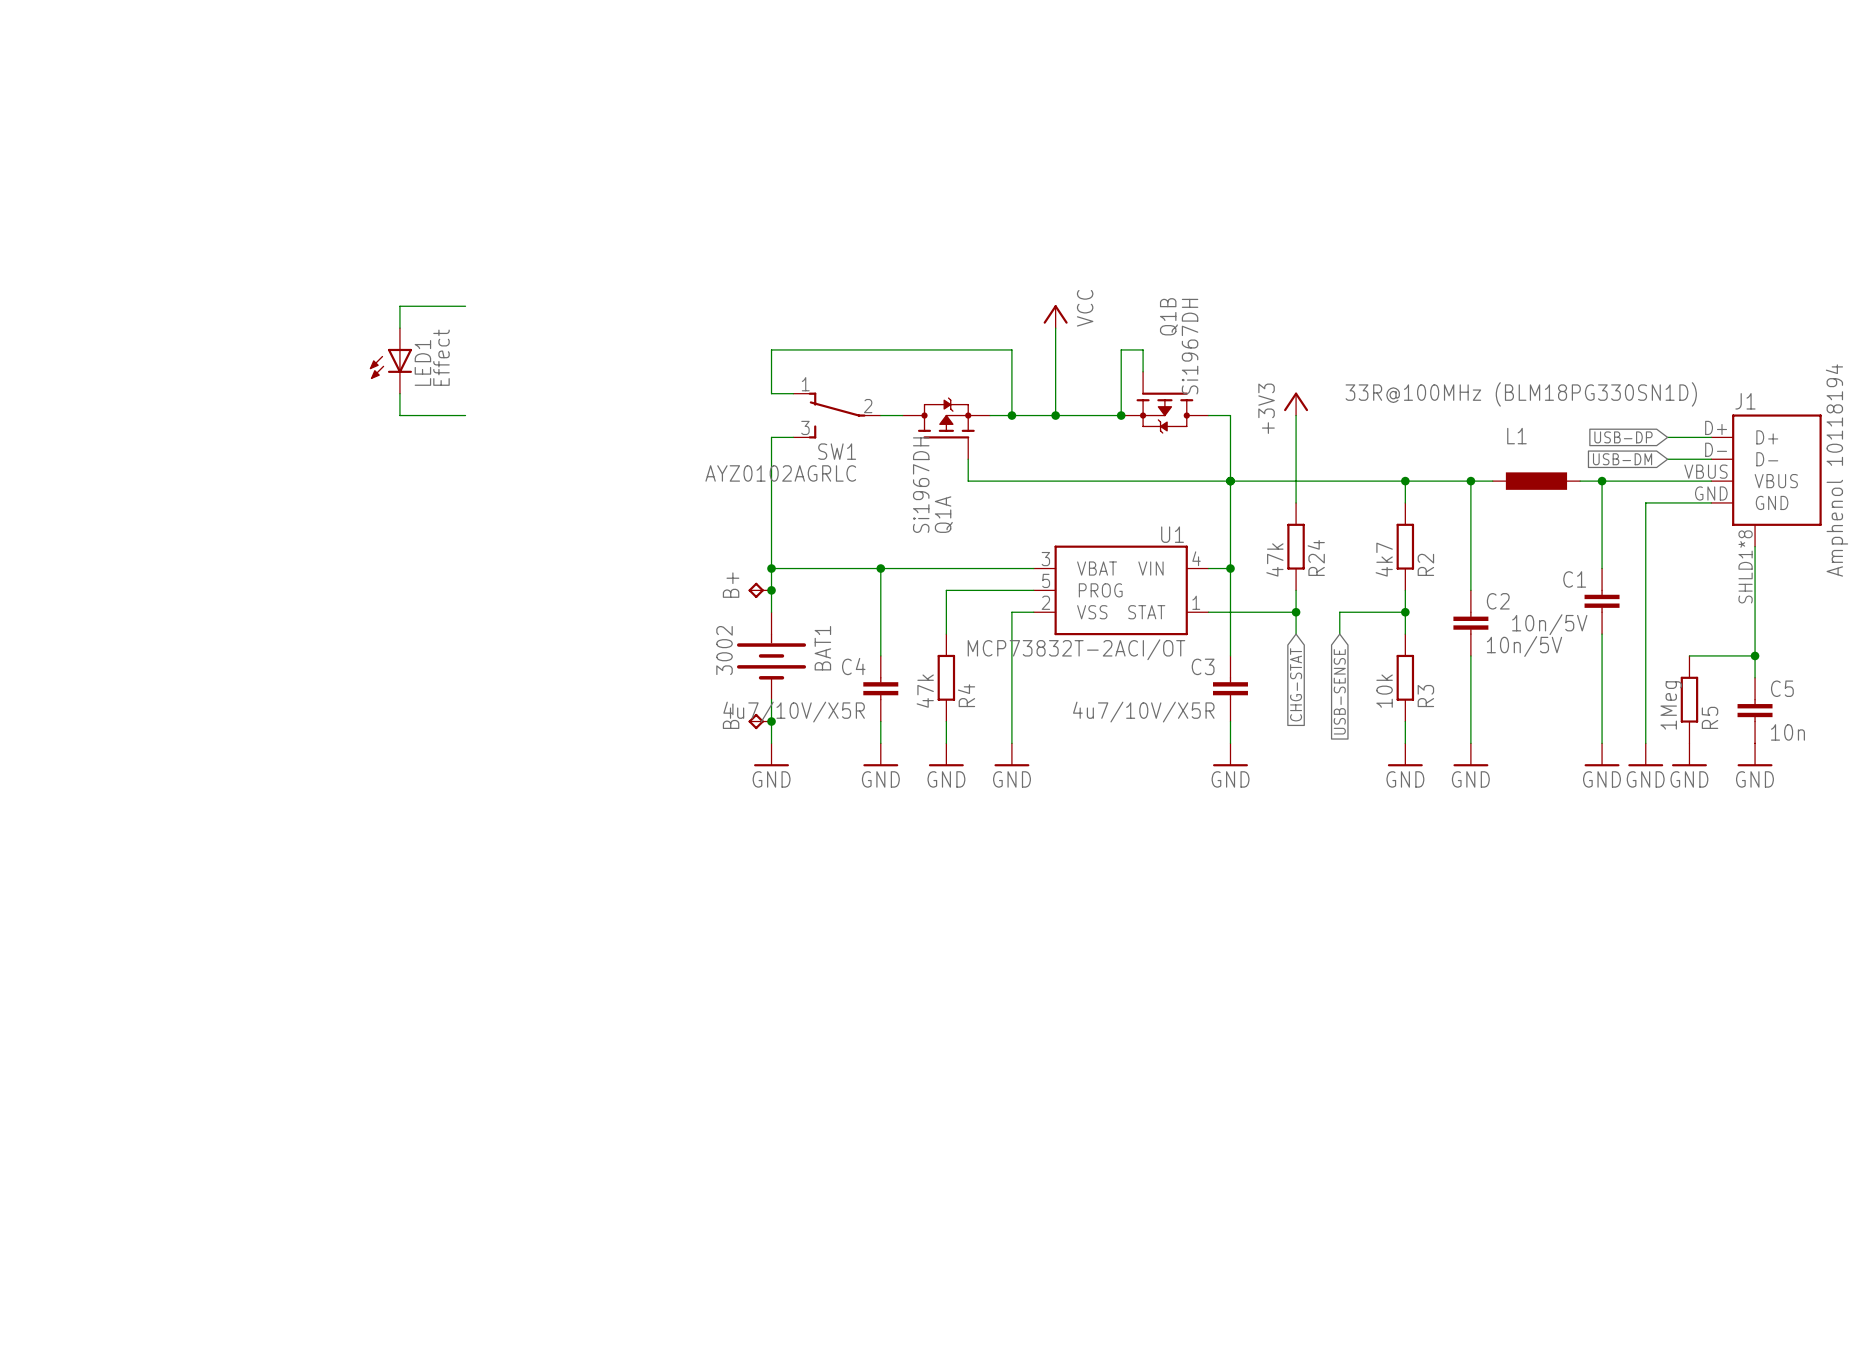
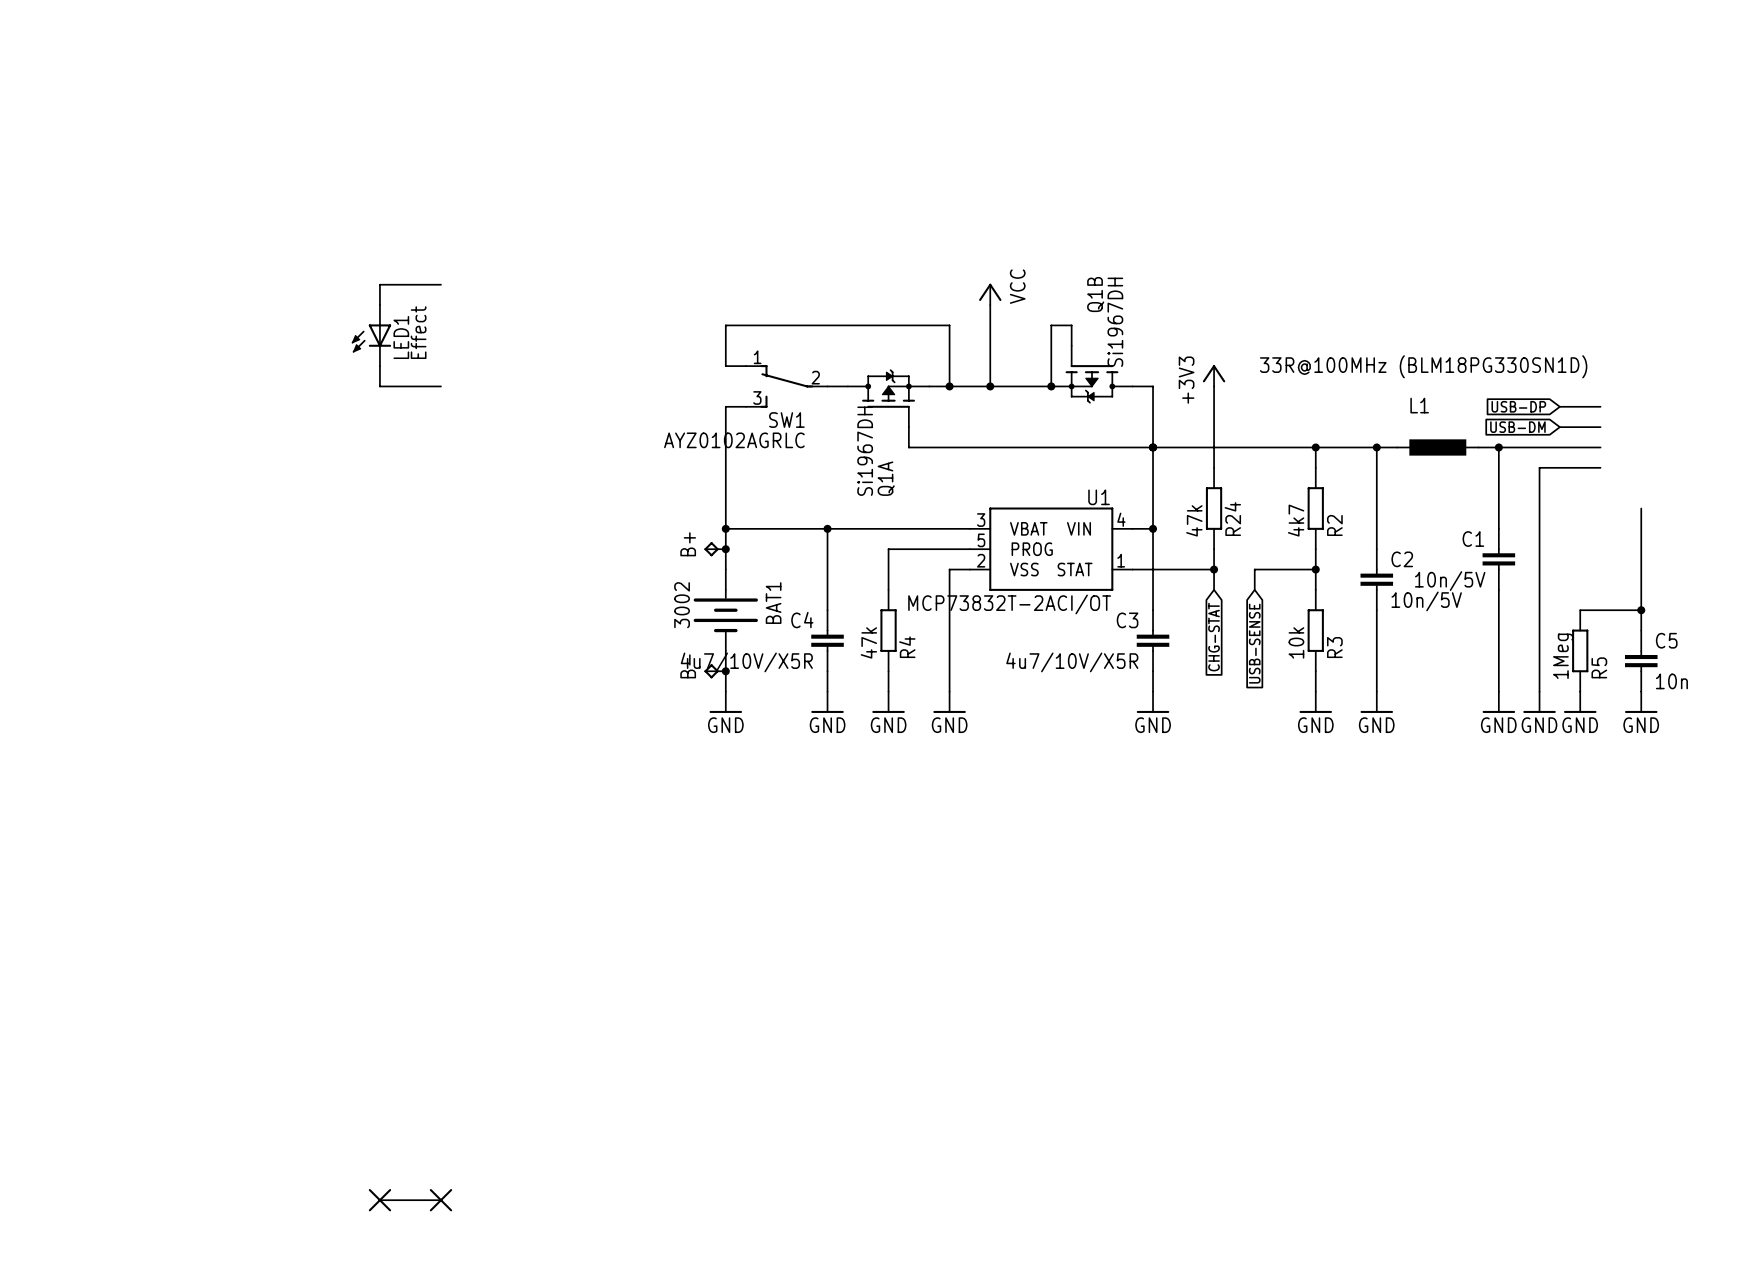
J1: Amphenol 10118194 (1766, 480) -> none
wire: none -> (379, 1200) (440, 1200)
part: none -> (379, 1200)
part: none -> (440, 1200)

